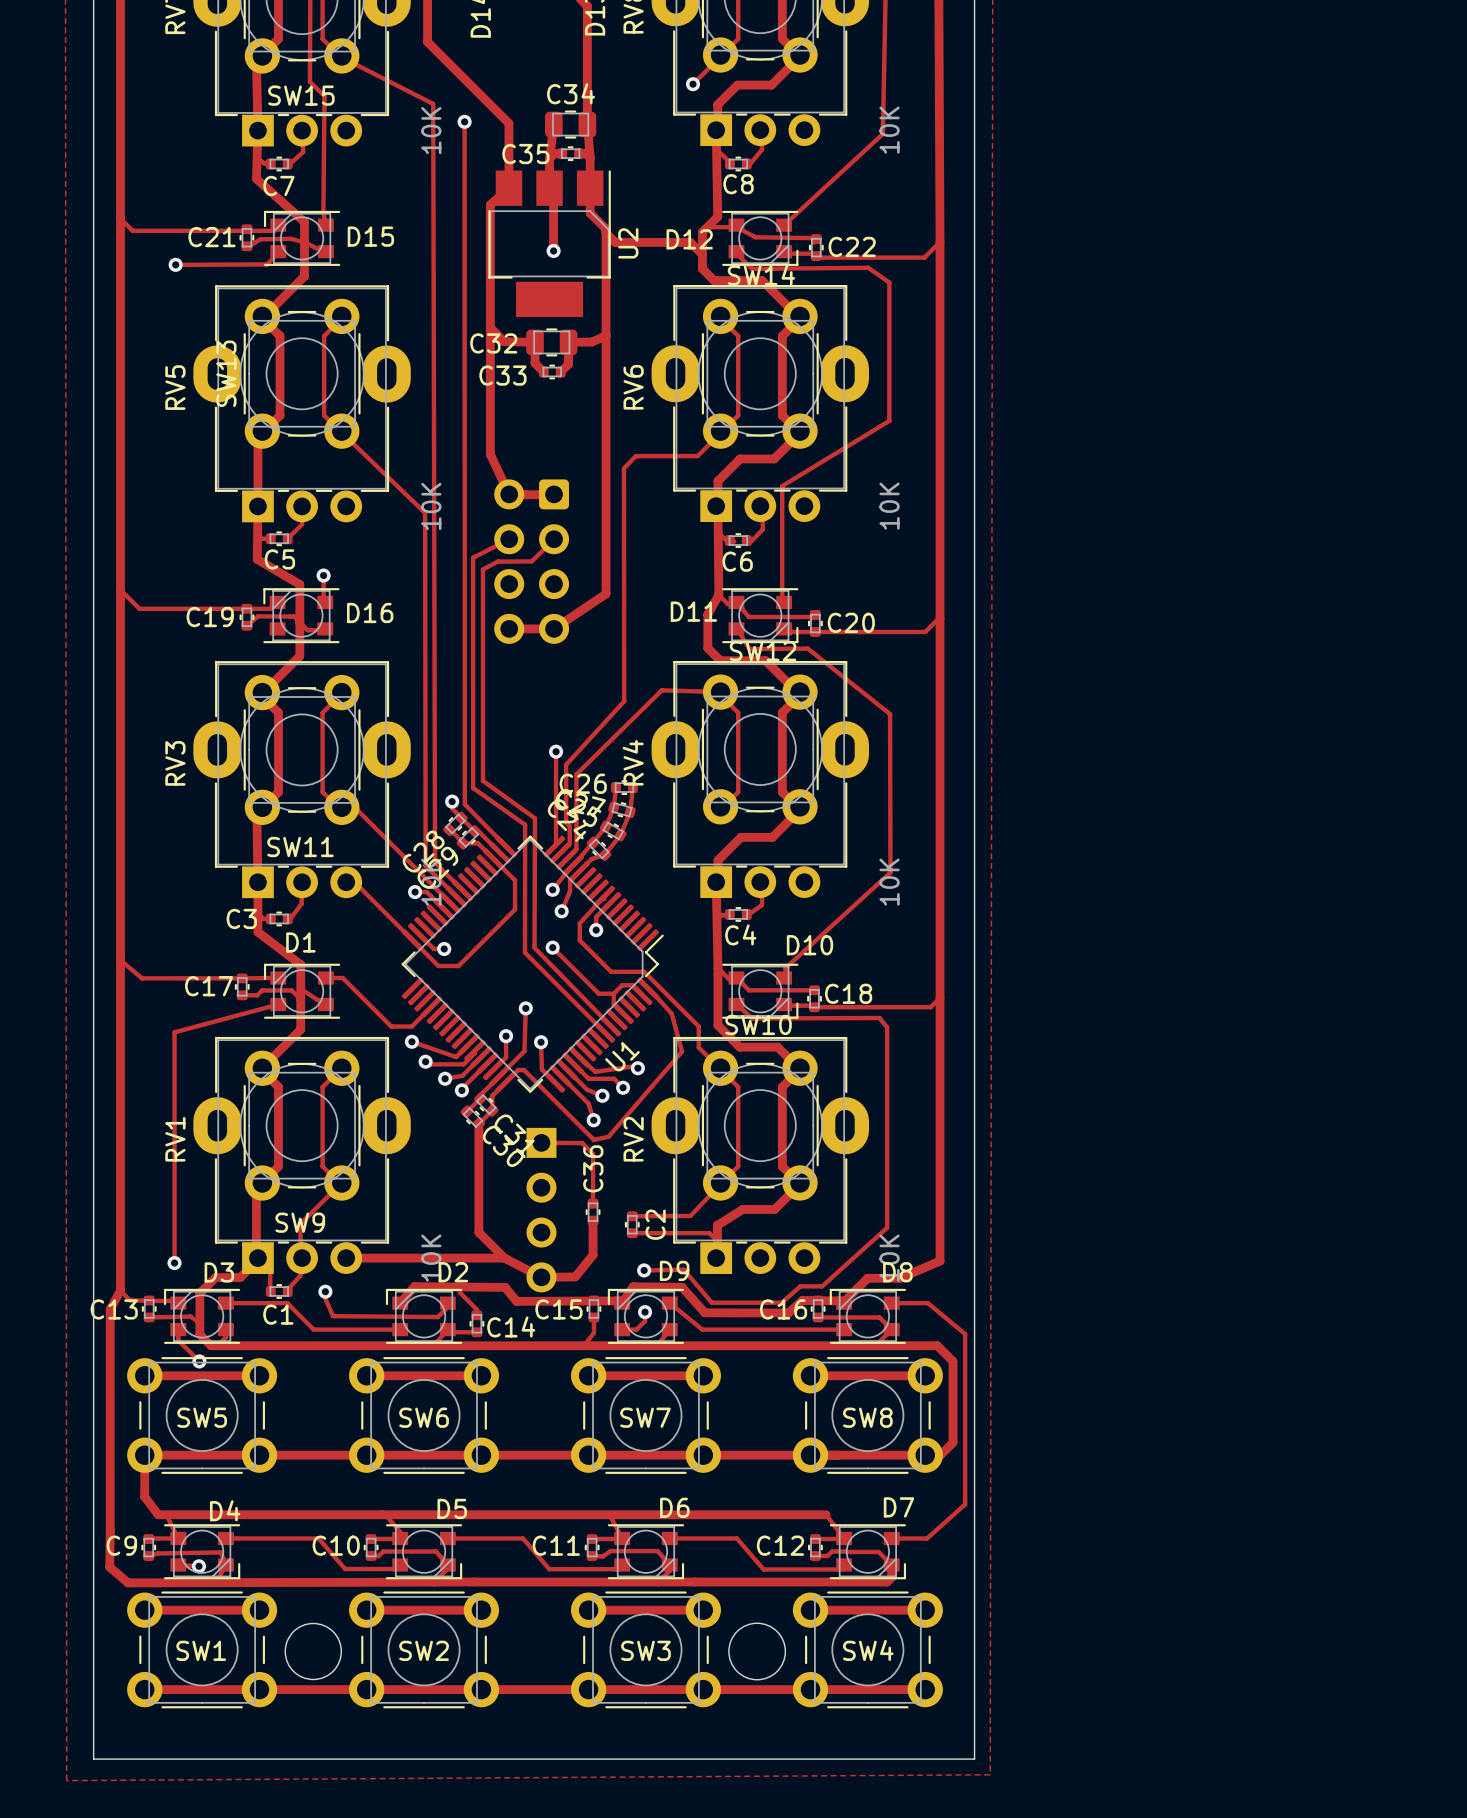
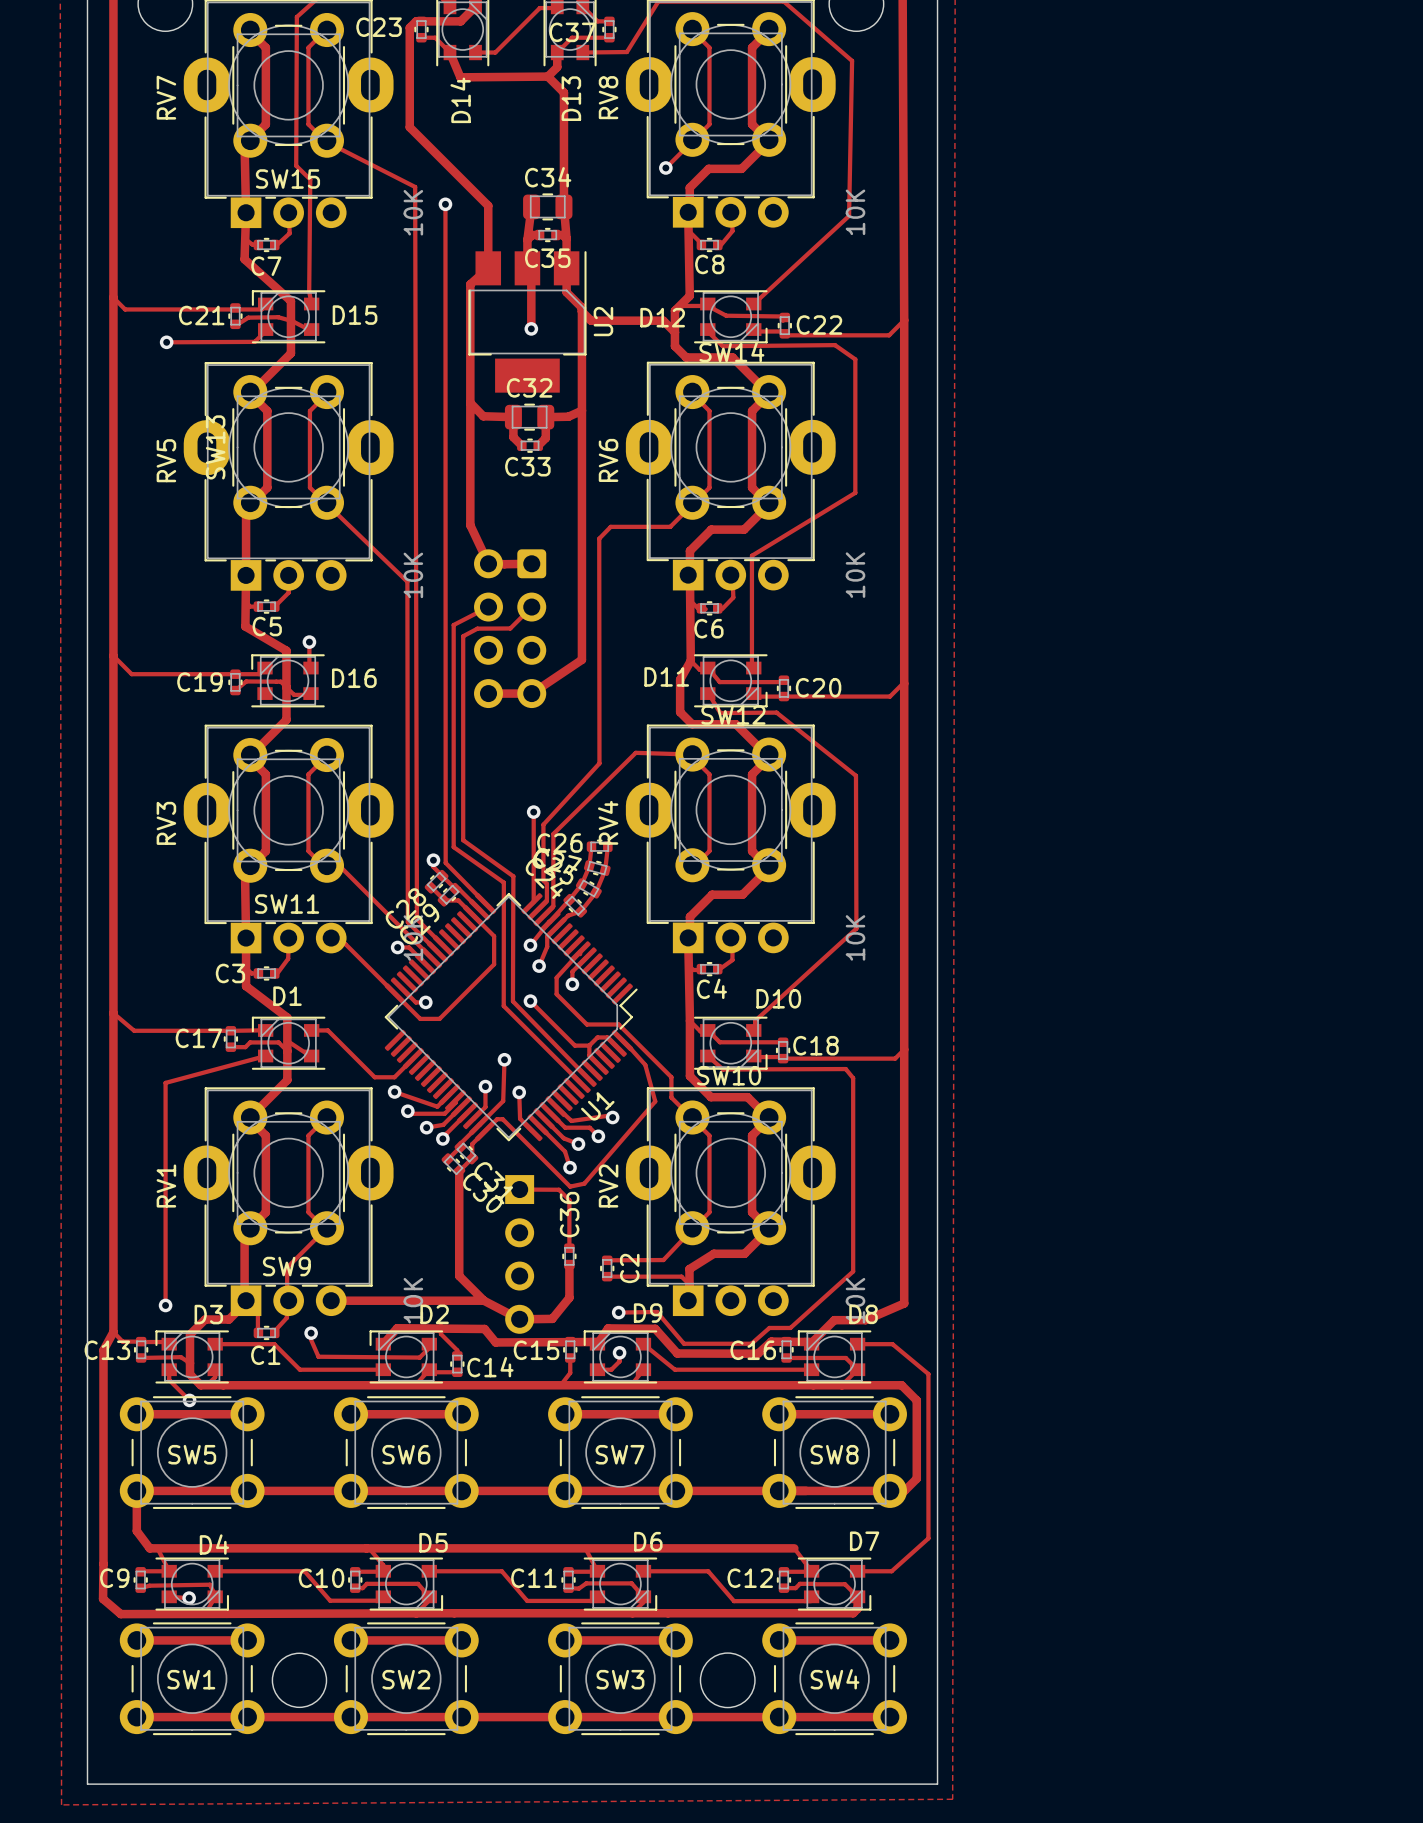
C35 name position: C35 (525, 154) -> C35 (547, 258)
C32 name position: C32 (493, 343) -> C32 (529, 387)
C33 name position: C33 (502, 375) -> C33 (527, 466)

